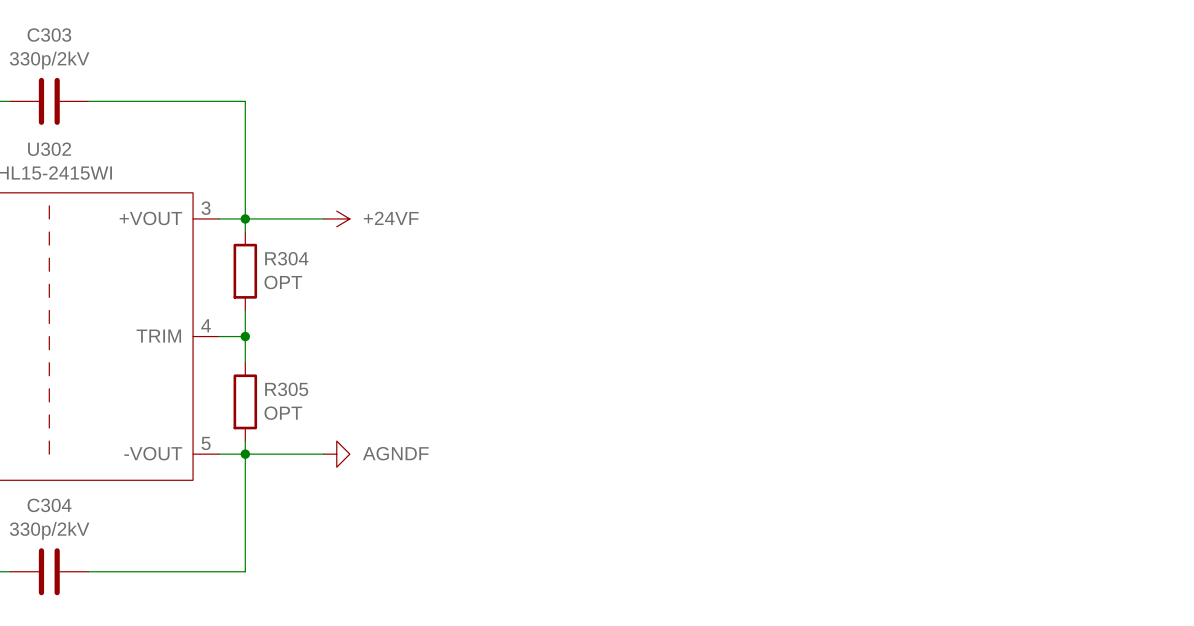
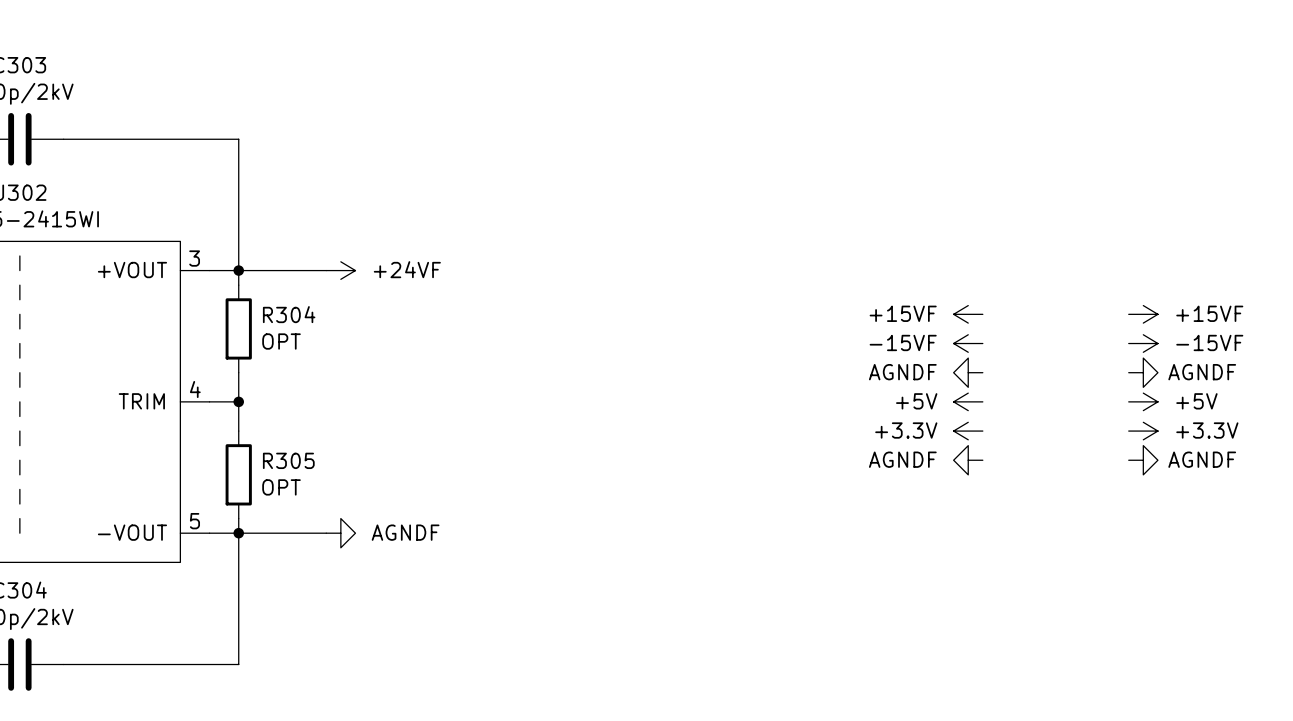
power symbol: none -> +15VF (968, 314)
power symbol: none -> +15VF (1143, 314)
power symbol: none -> -15VF (968, 343)
power symbol: none -> -15VF (1143, 343)
power symbol: none -> AGNDF (968, 372)
power symbol: none -> AGNDF (1143, 372)
power symbol: none -> +5V (968, 401)
power symbol: none -> +5V (1143, 401)
power symbol: none -> +3.3V (968, 431)
power symbol: none -> +3.3V (1143, 431)
power symbol: none -> AGNDF (968, 460)
power symbol: none -> AGNDF (1143, 460)

